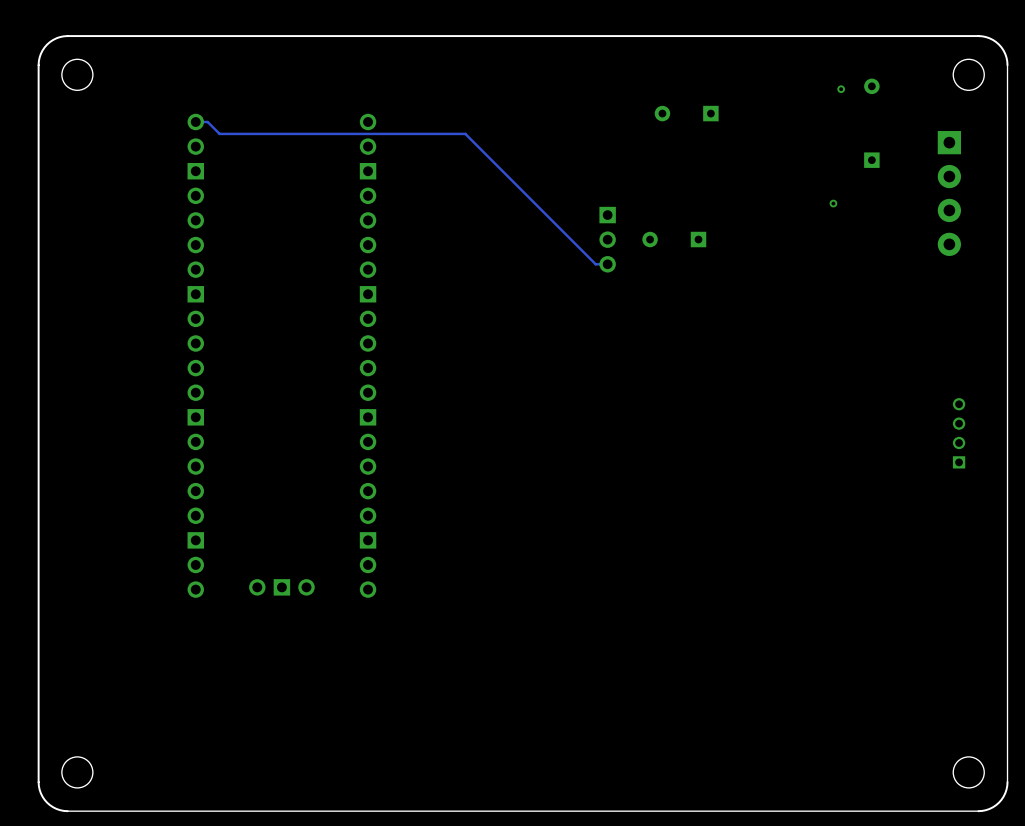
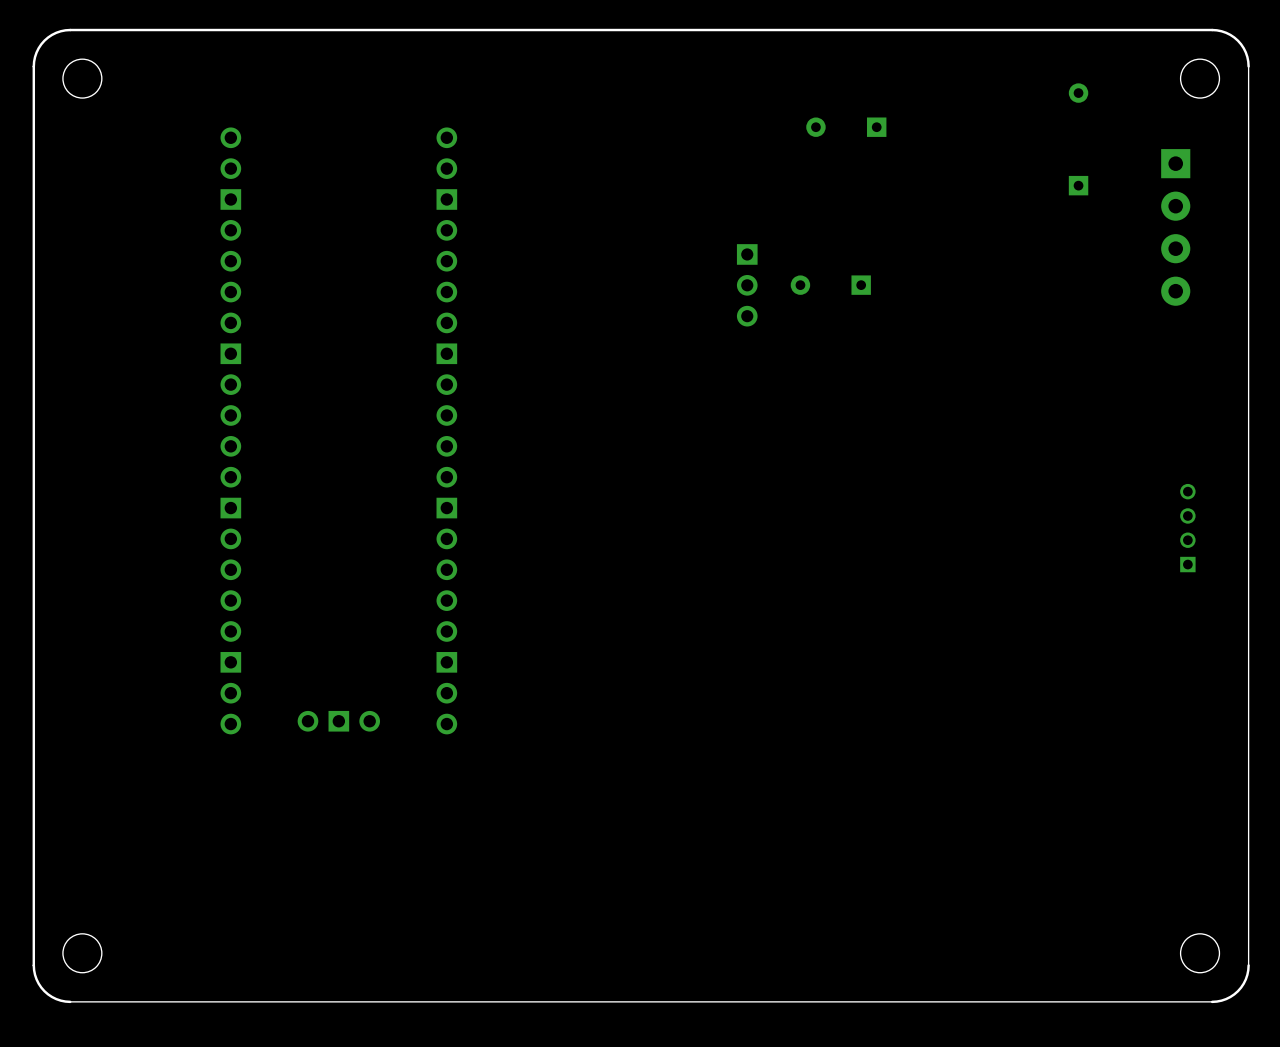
via: (841, 89) -> none
track: (195, 122) (207, 122) (219, 133) (465, 133) (595, 264) (607, 264) -> none
via: (833, 203) -> none

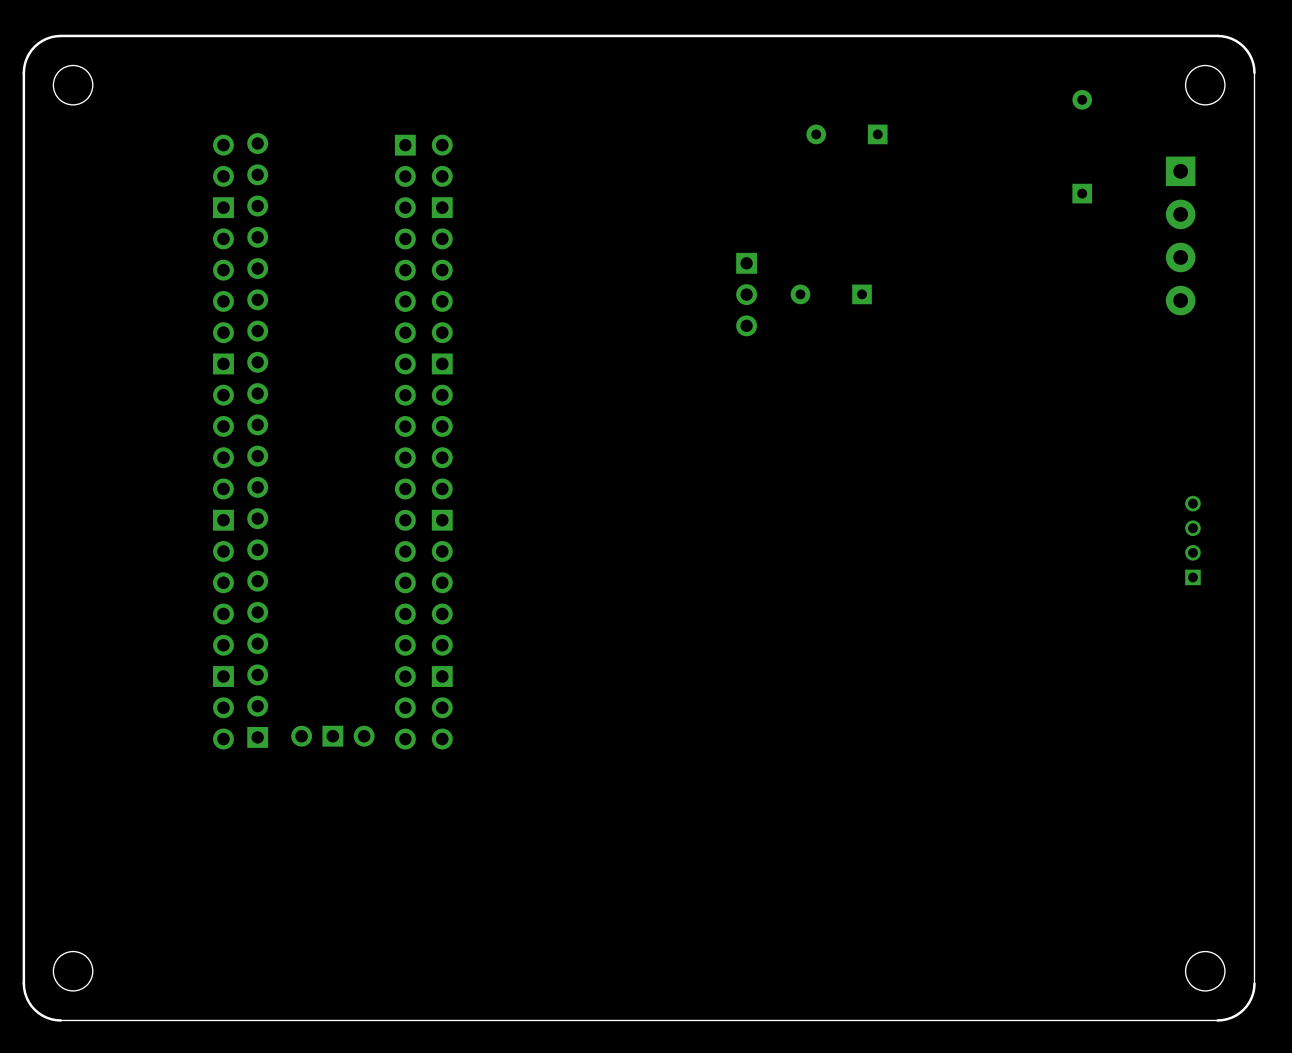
part: none -> (257, 440)
part: none -> (405, 442)

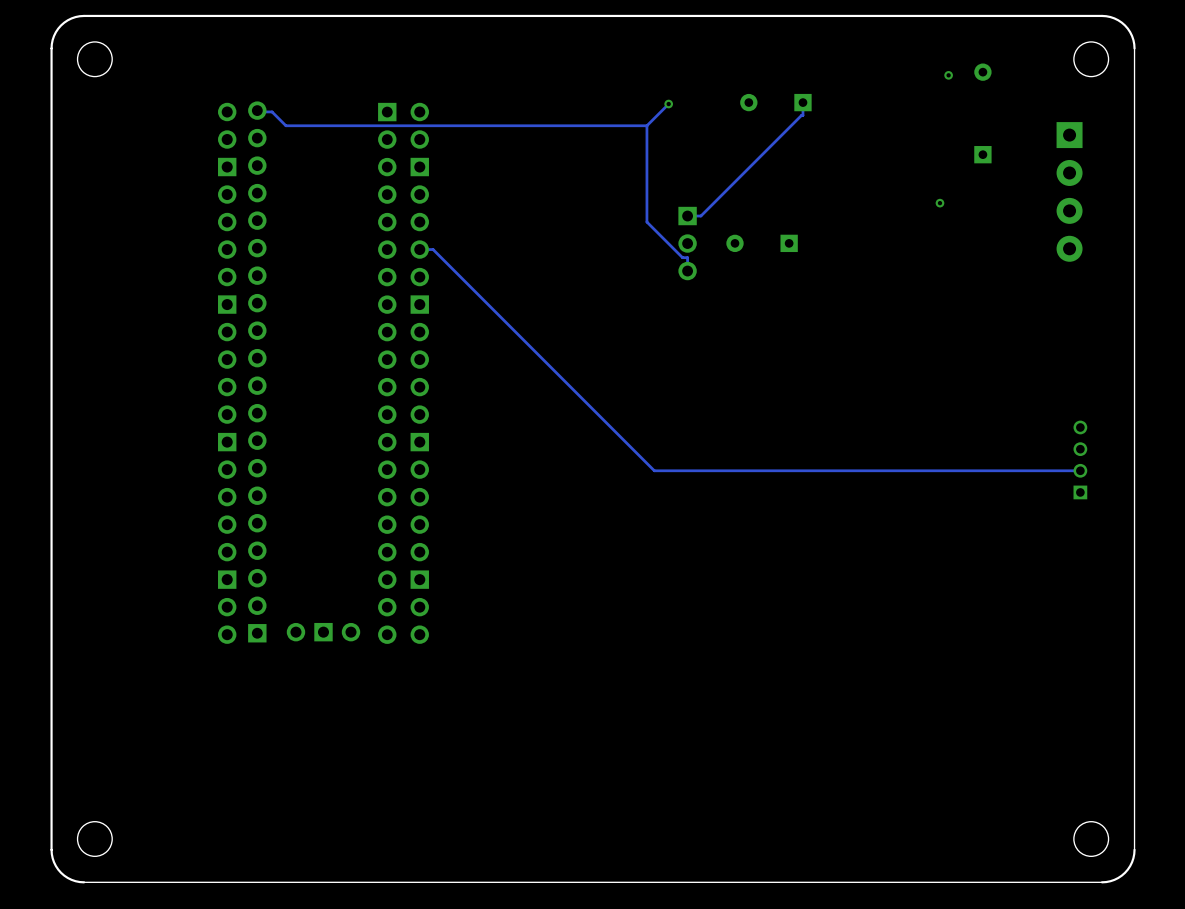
via: none -> (948, 75)
track: none -> (802, 102) (802, 115) (700, 216) (687, 216)
track: none -> (668, 104) (646, 125)
via: none -> (668, 104)
track: none -> (258, 111) (272, 111) (285, 125) (646, 125)
track: none -> (646, 125) (646, 222) (682, 257) (687, 257) (687, 271)
via: none -> (939, 203)
track: none -> (419, 249) (433, 249) (654, 470) (1080, 470)

